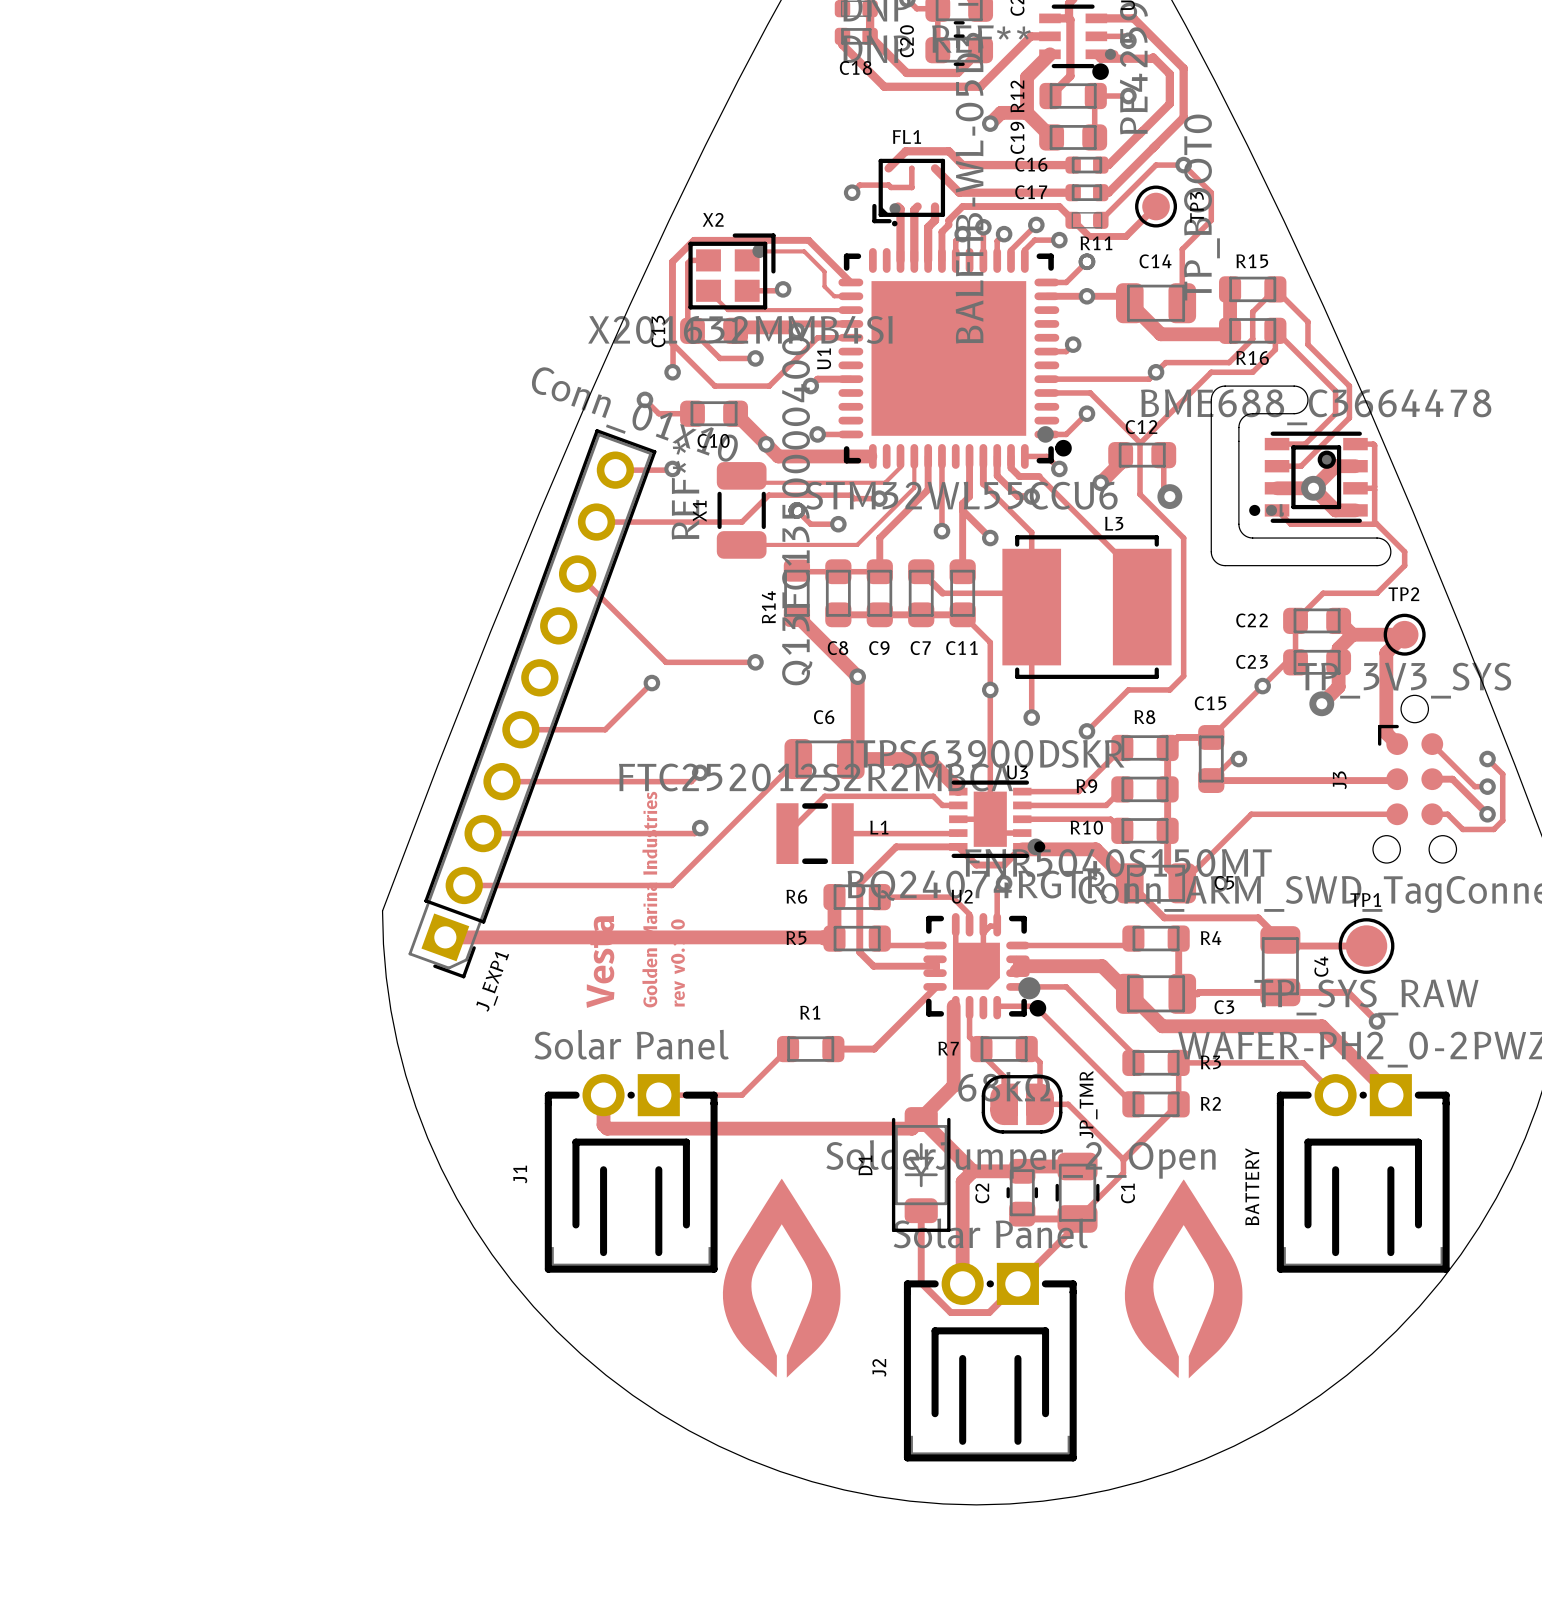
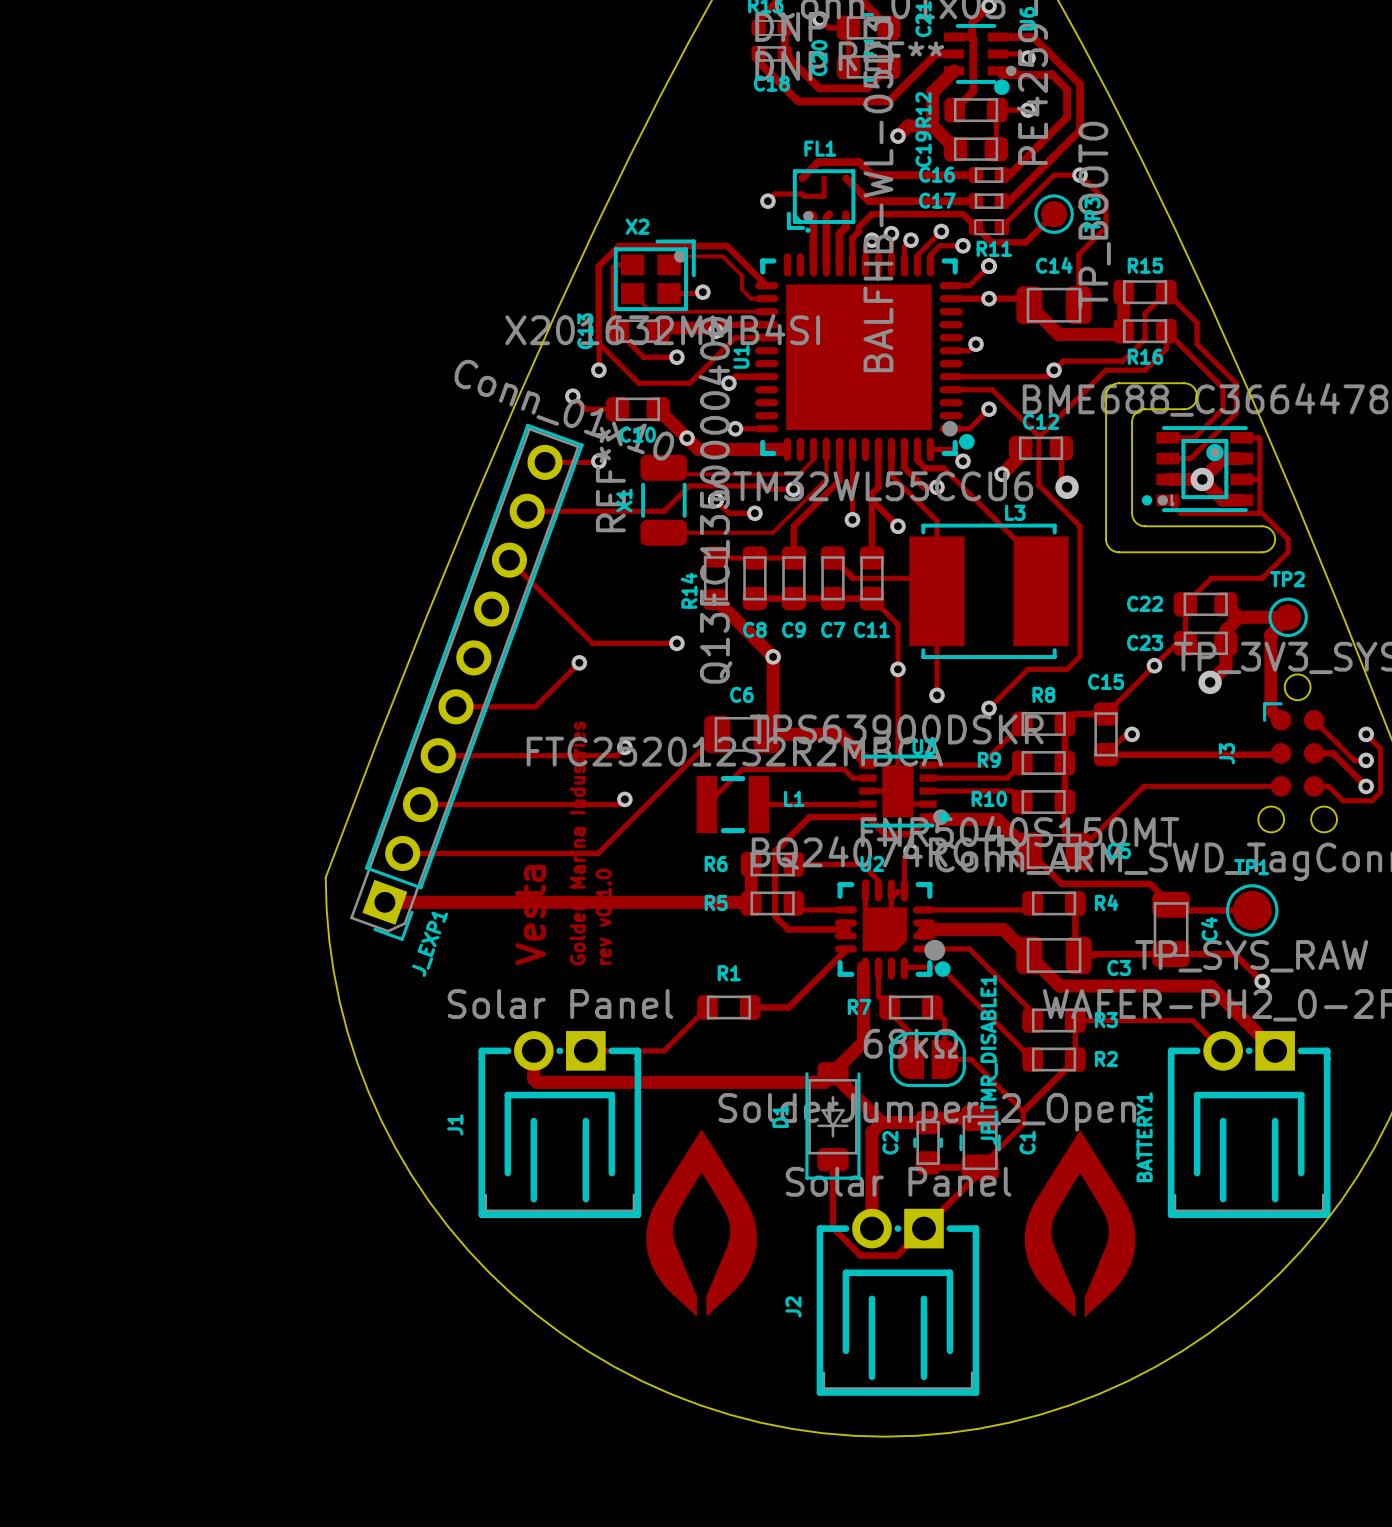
JP_TMR name: JP_TMR (1088, 1104) -> JP_TMR_DISABLE1 (989, 1059)
BATTERY name: BATTERY (1252, 1186) -> BATTERY1 (1144, 1137)

